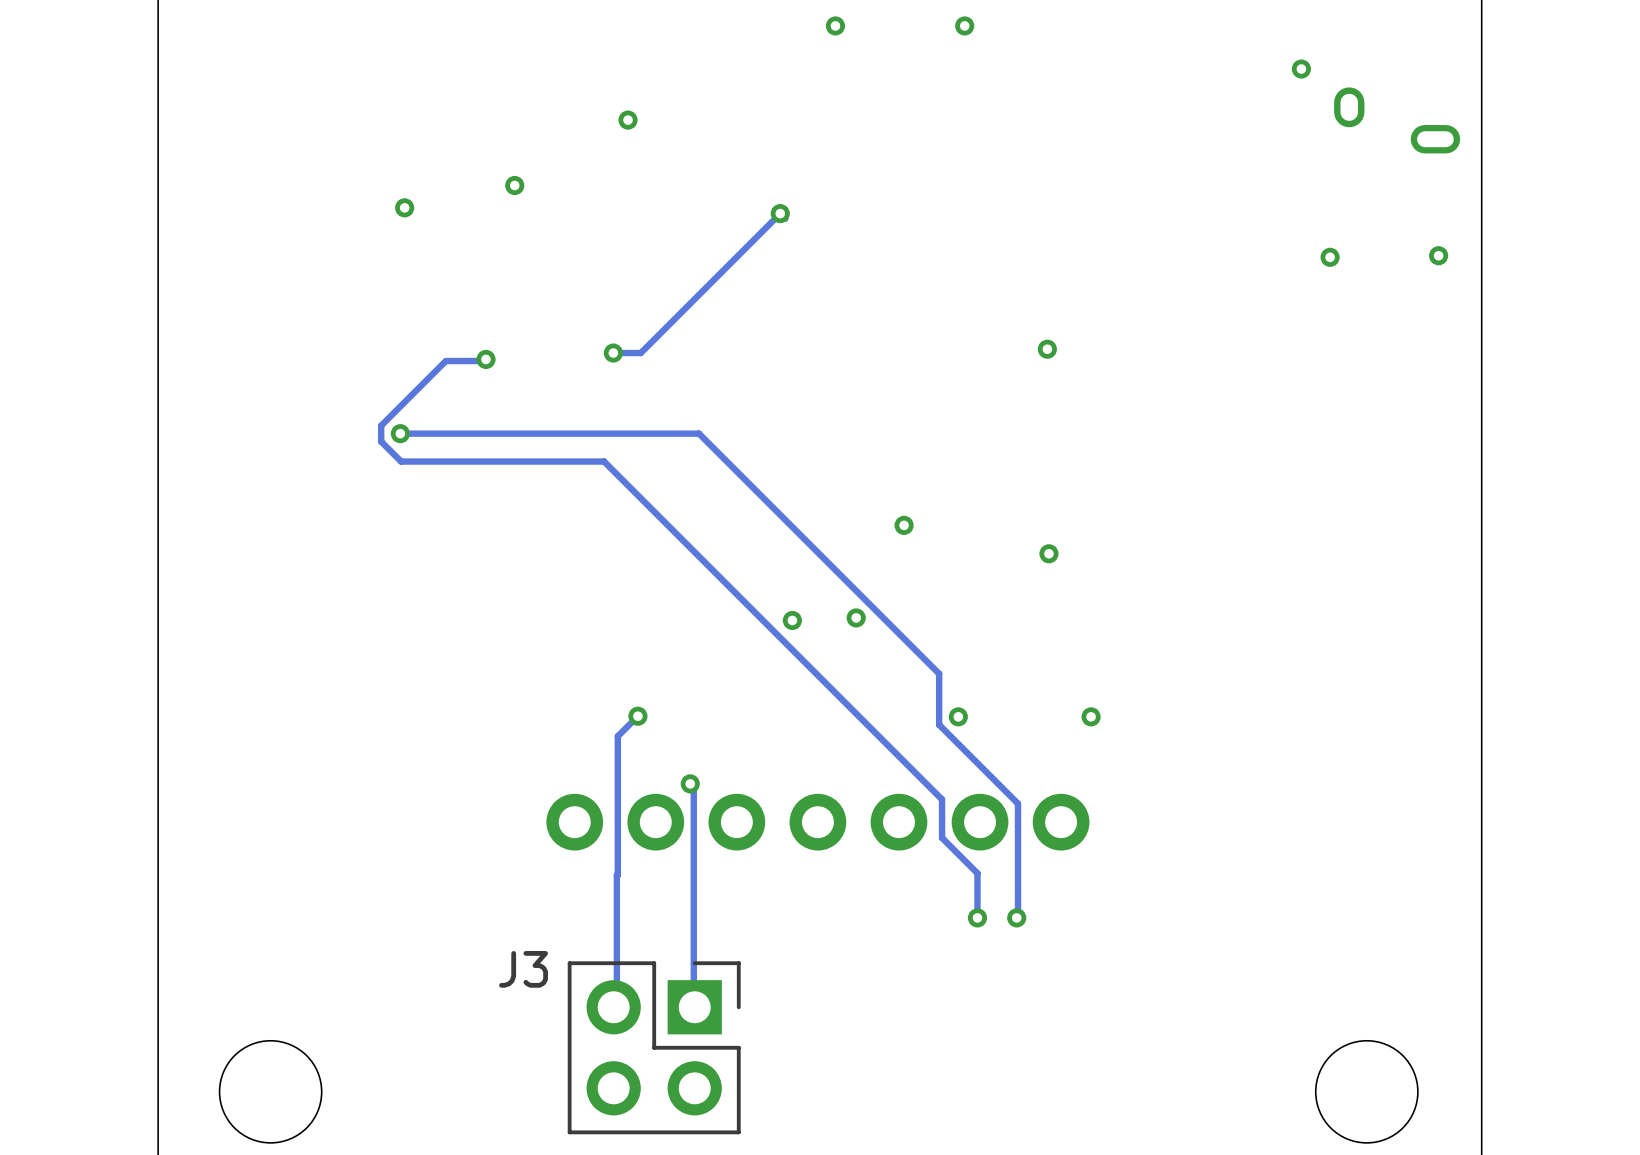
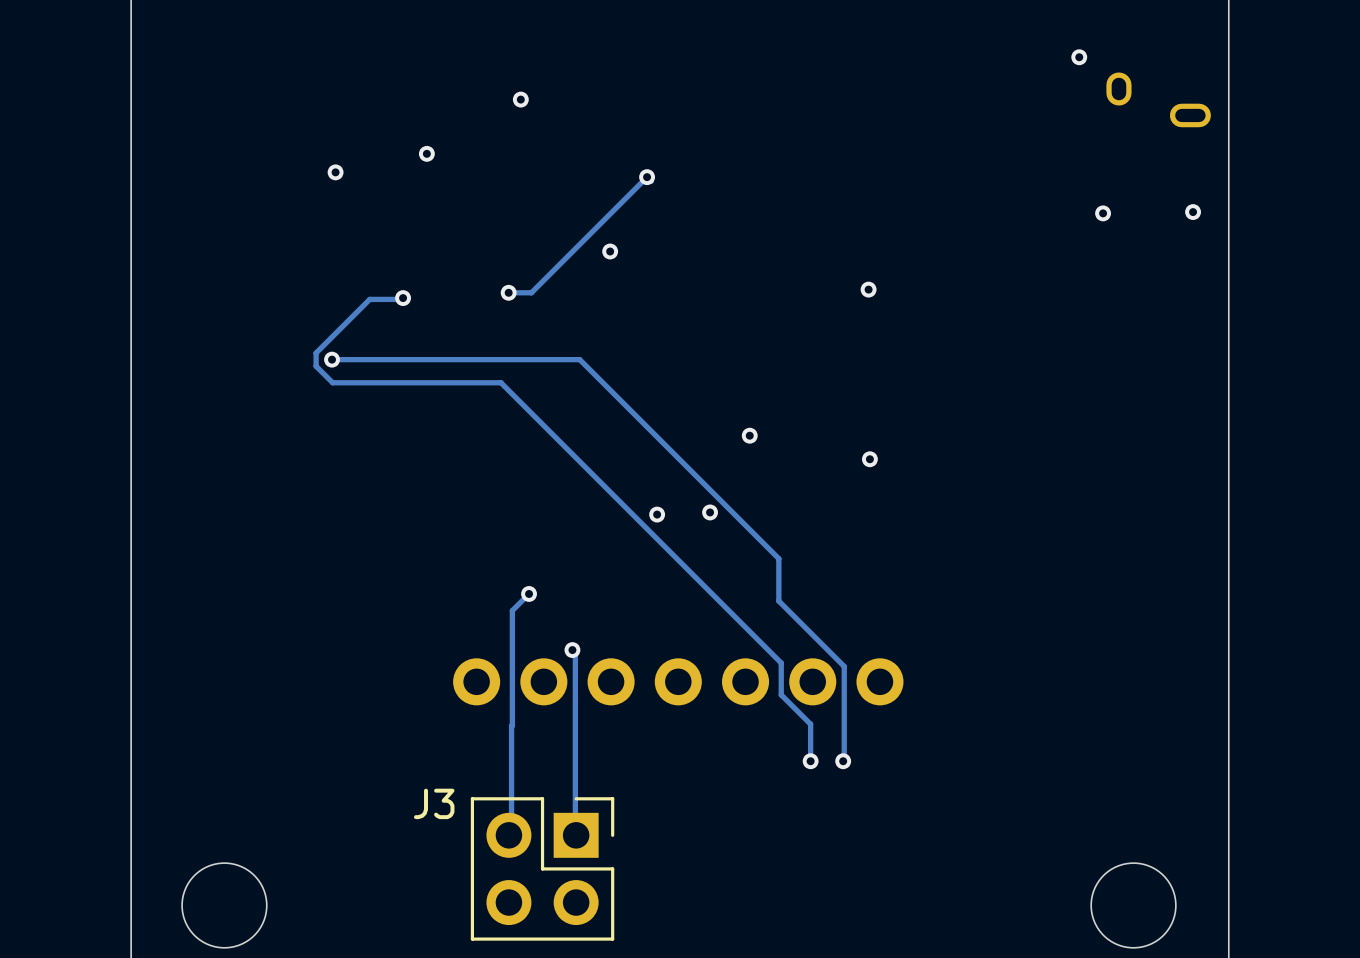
via: (835, 25) -> none
via: (964, 25) -> none
via: none -> (610, 251)
via: (958, 716) -> none
via: (1091, 716) -> none

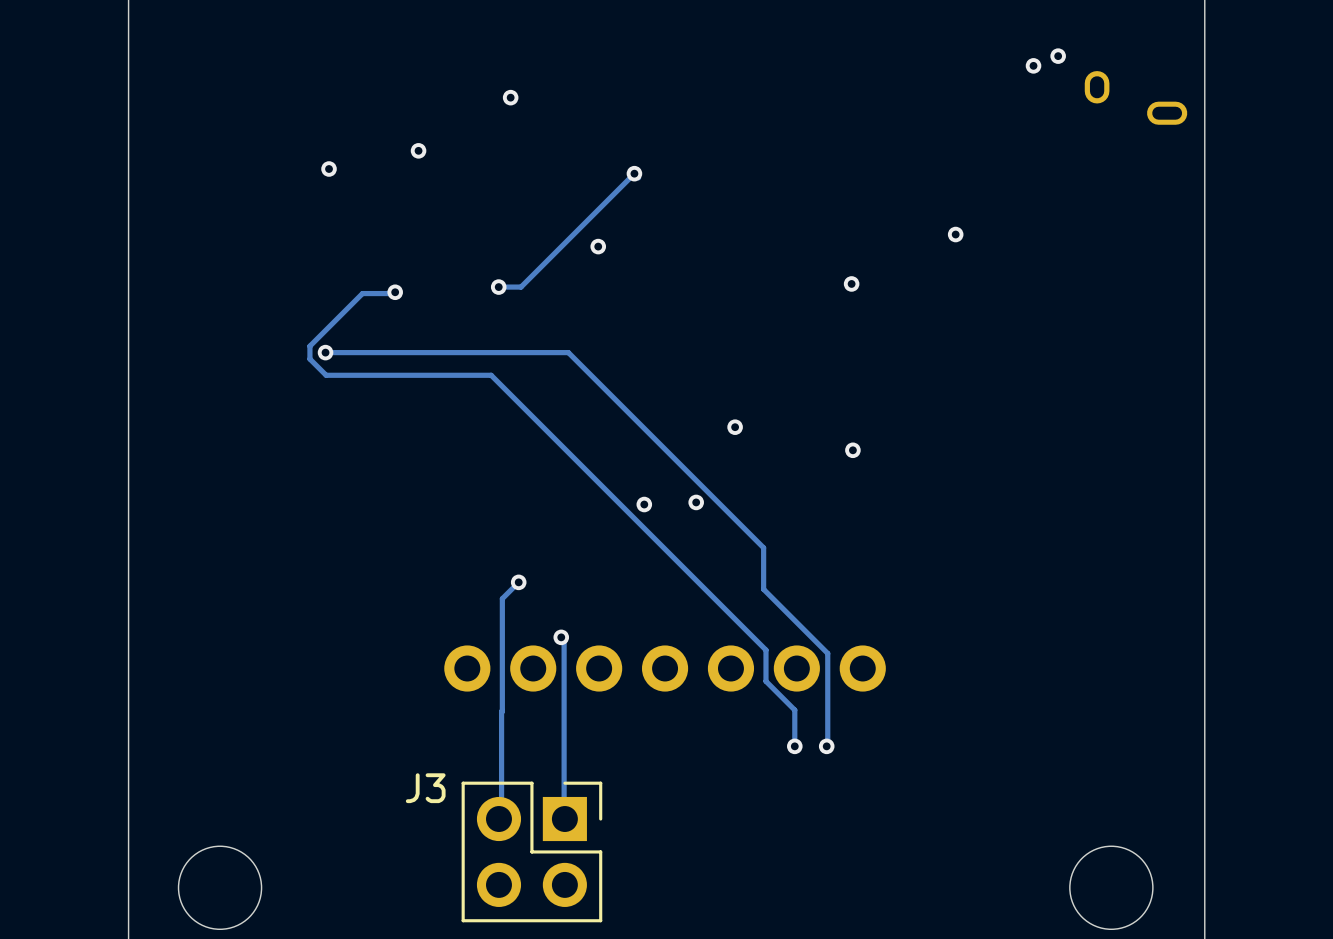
via: none -> (1033, 65)
via: (1193, 212) -> none
via: (1103, 213) -> none
via: none -> (955, 234)

